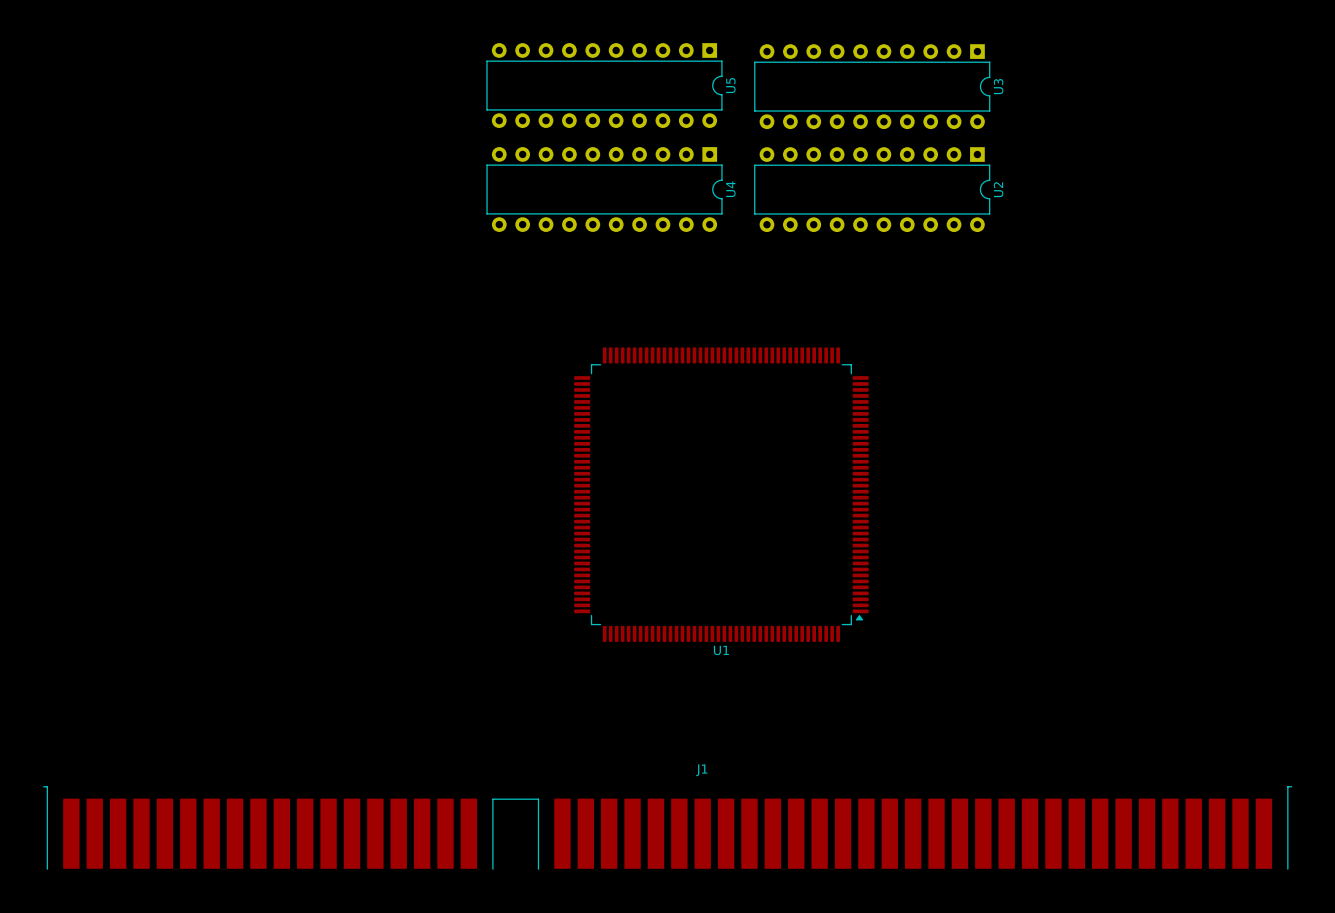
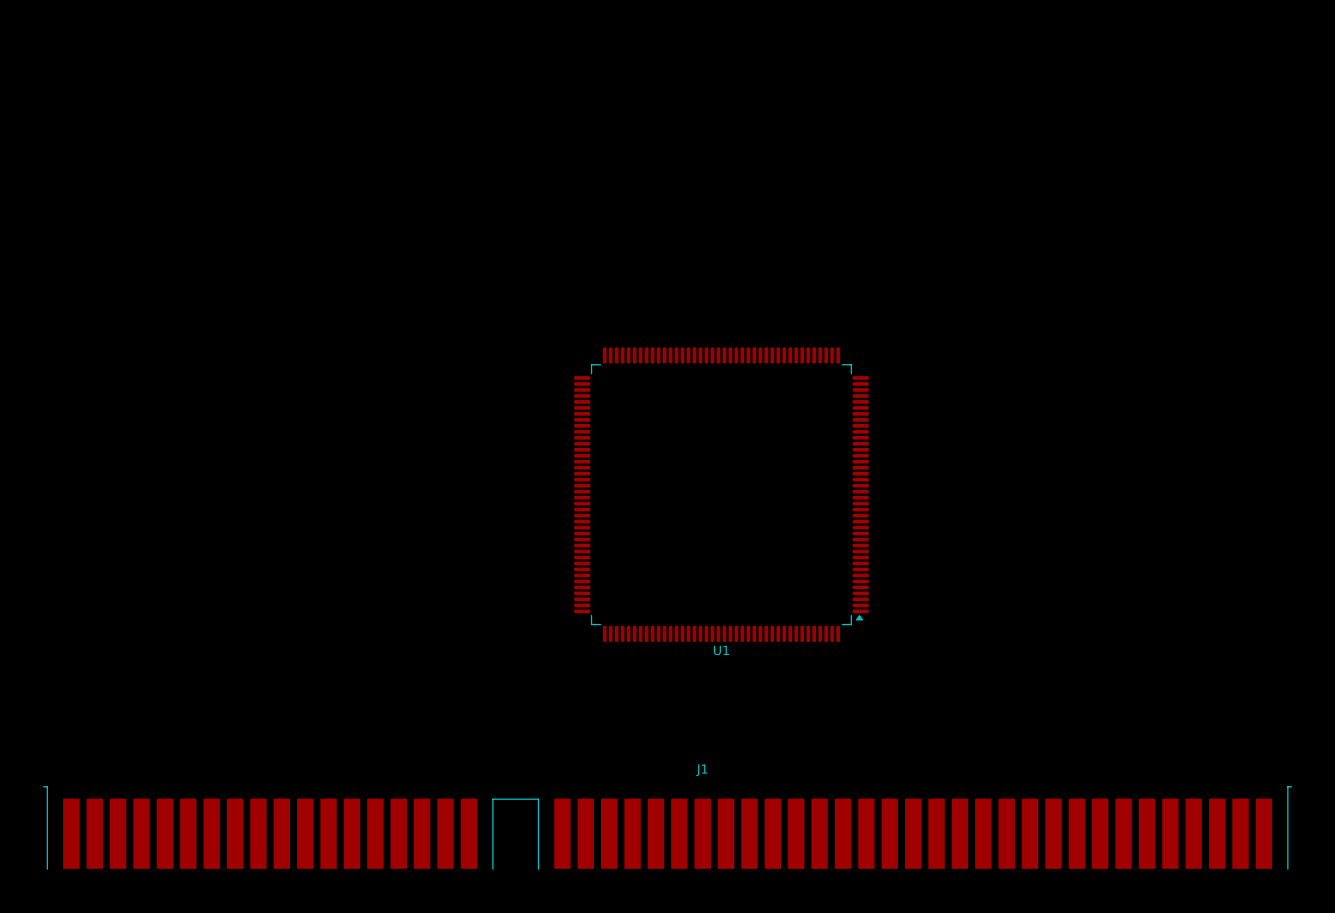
U5: (604, 85) -> none
U3: (872, 86) -> none
U4: (604, 189) -> none
U2: (872, 189) -> none

